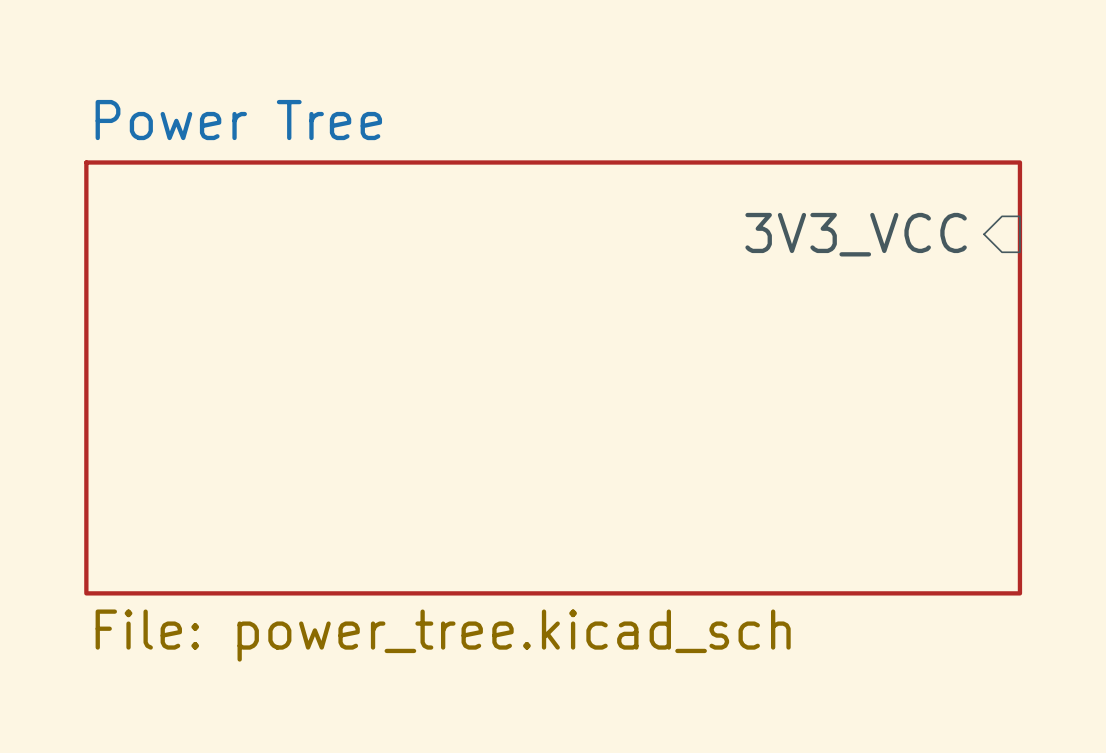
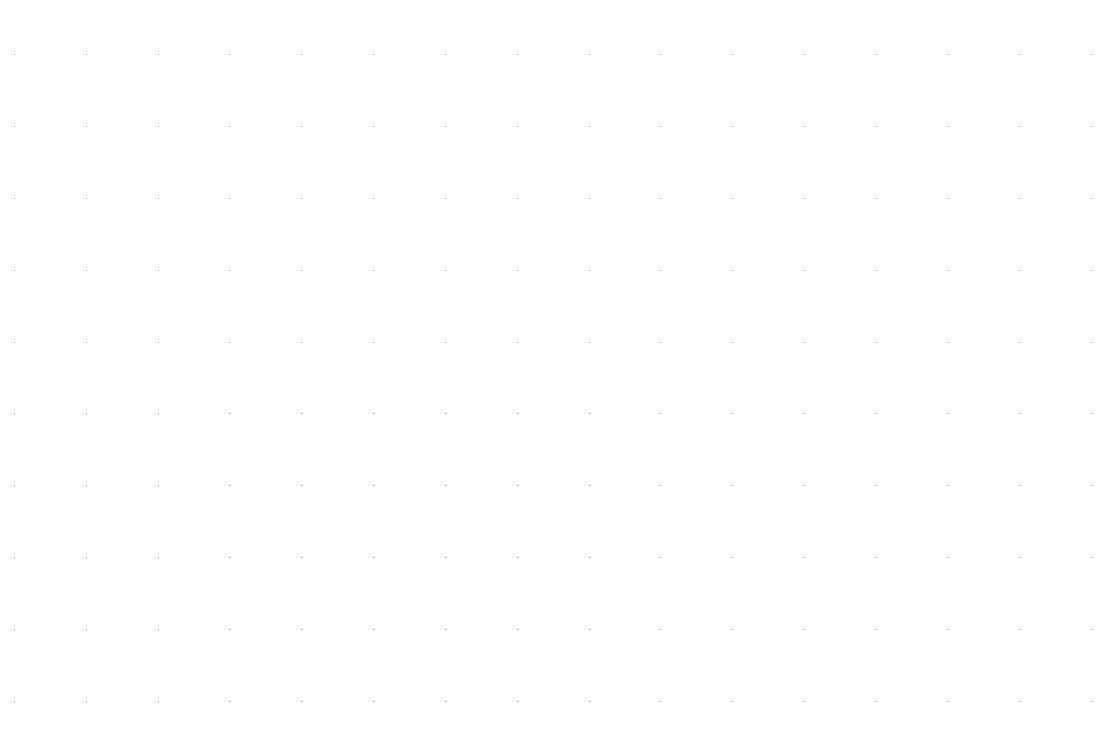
sheet pin: 3V3_VCC (856, 234) -> none
sheet Power Tree: File: power_tree.kicad_sch (553, 377) -> none

